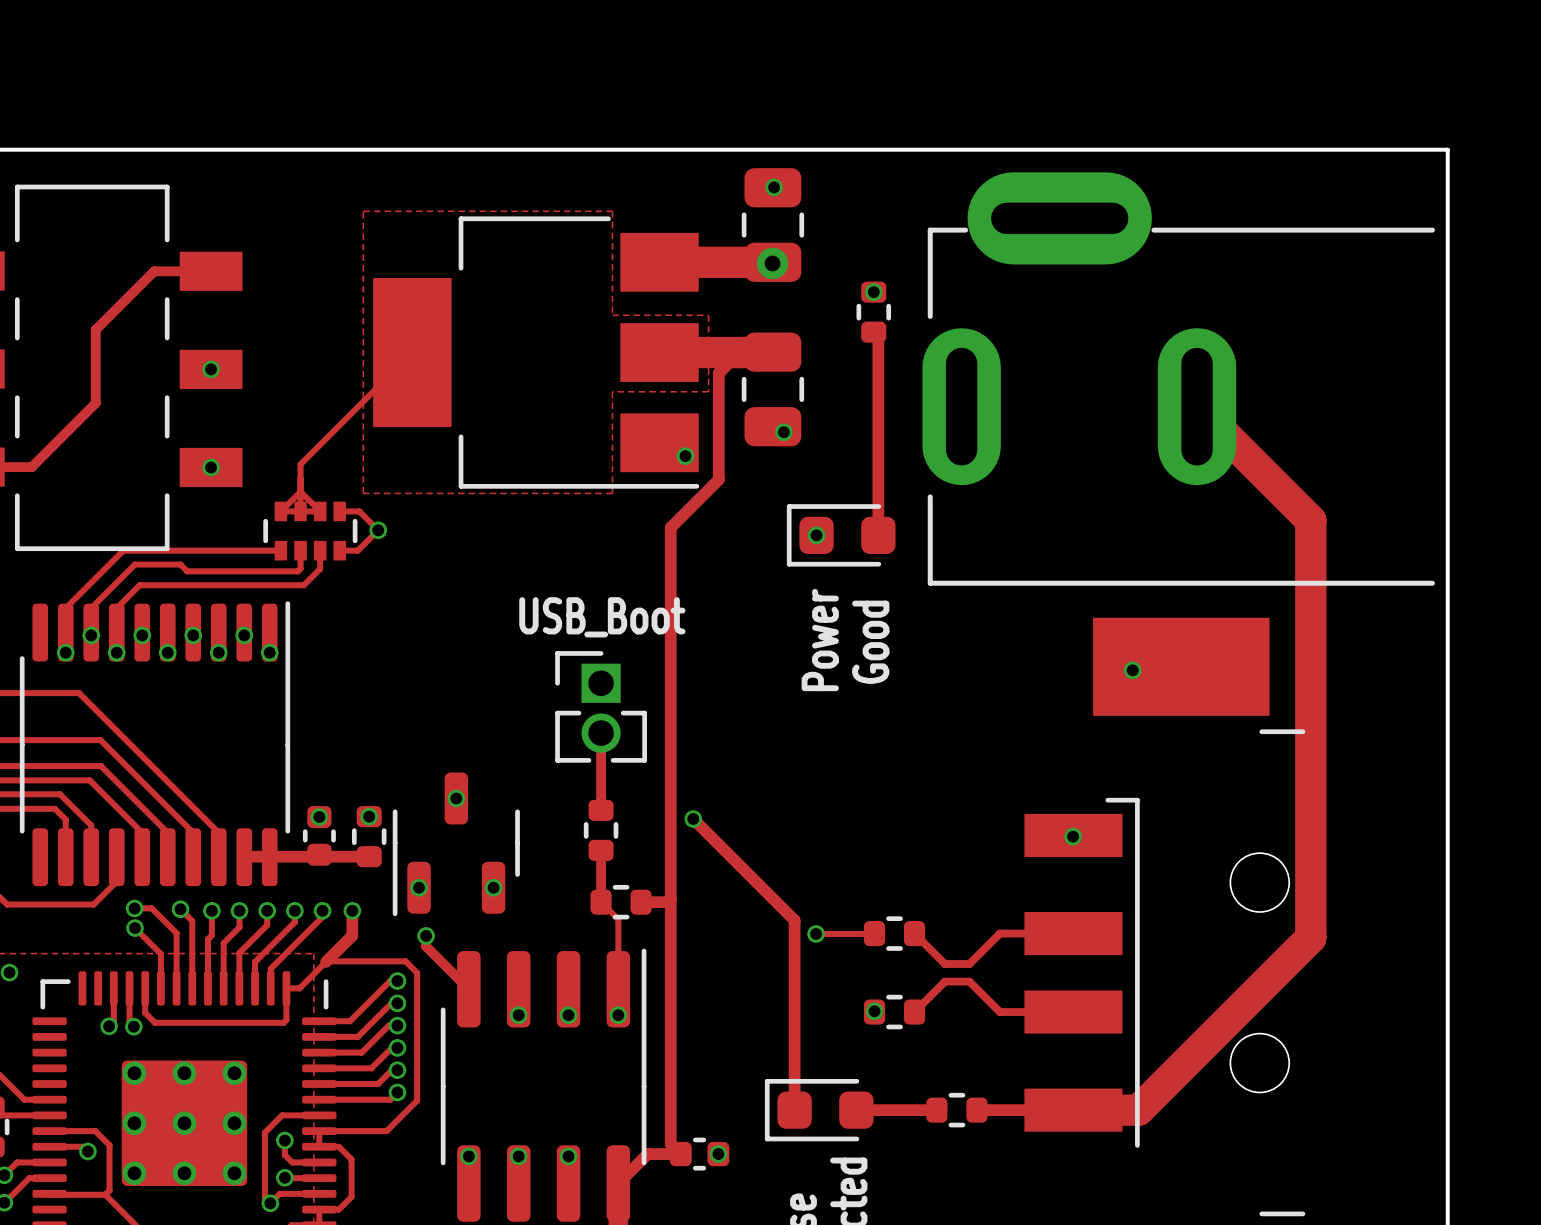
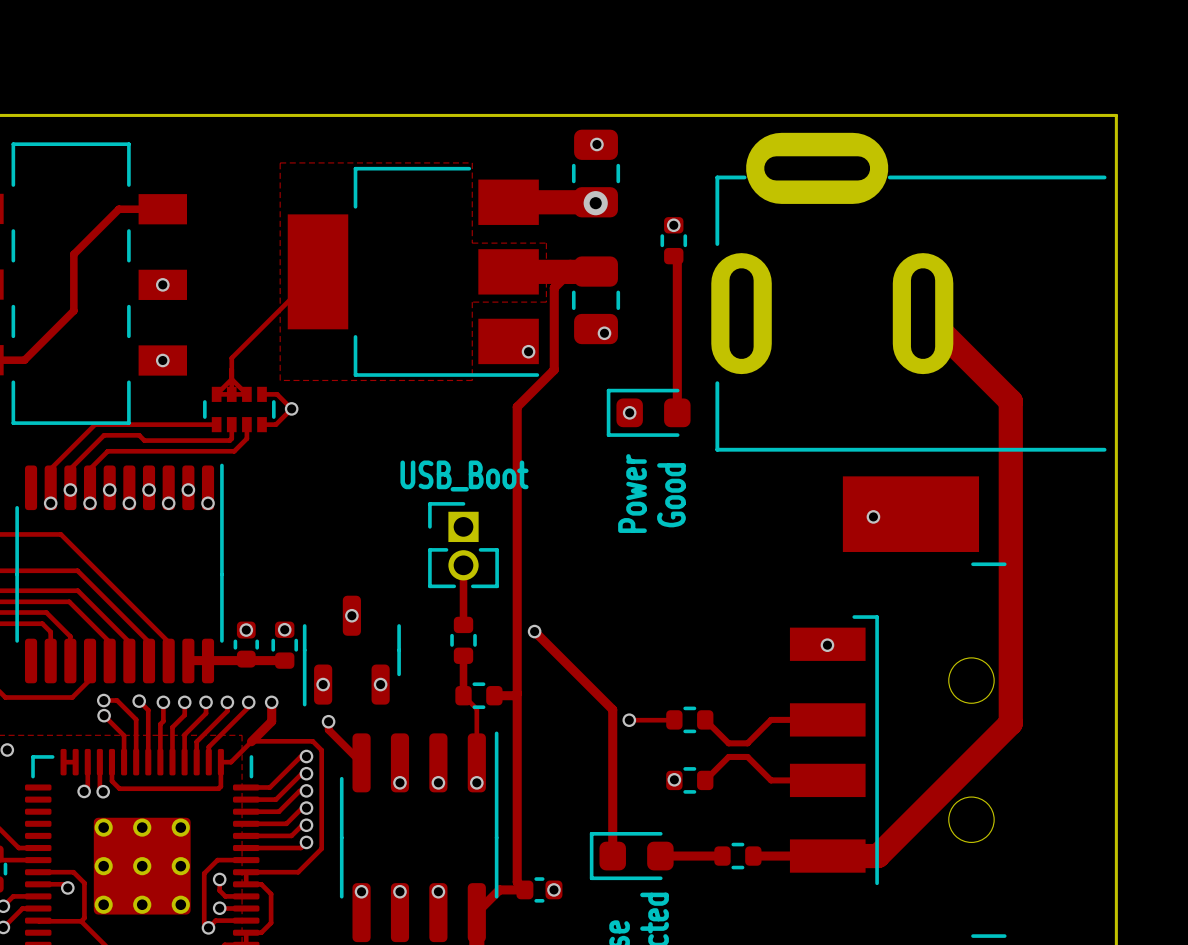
track: none -> (63, 762) (75, 762)

